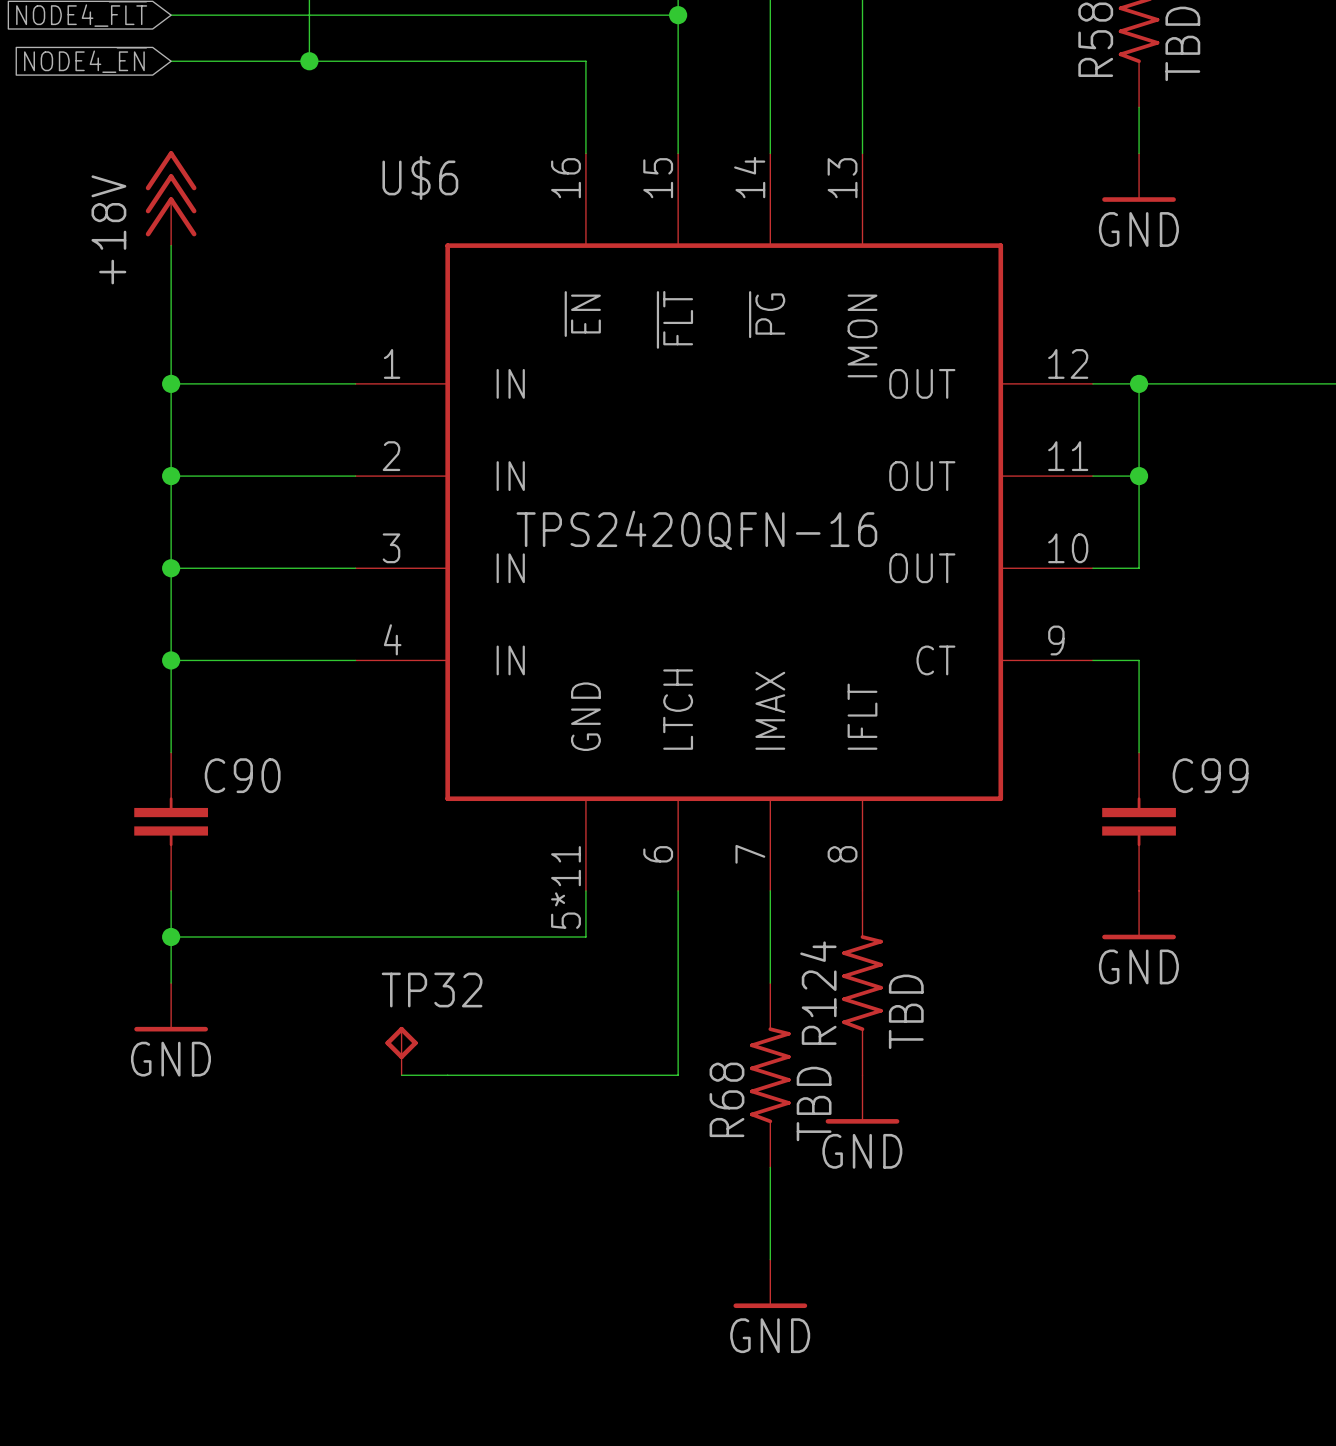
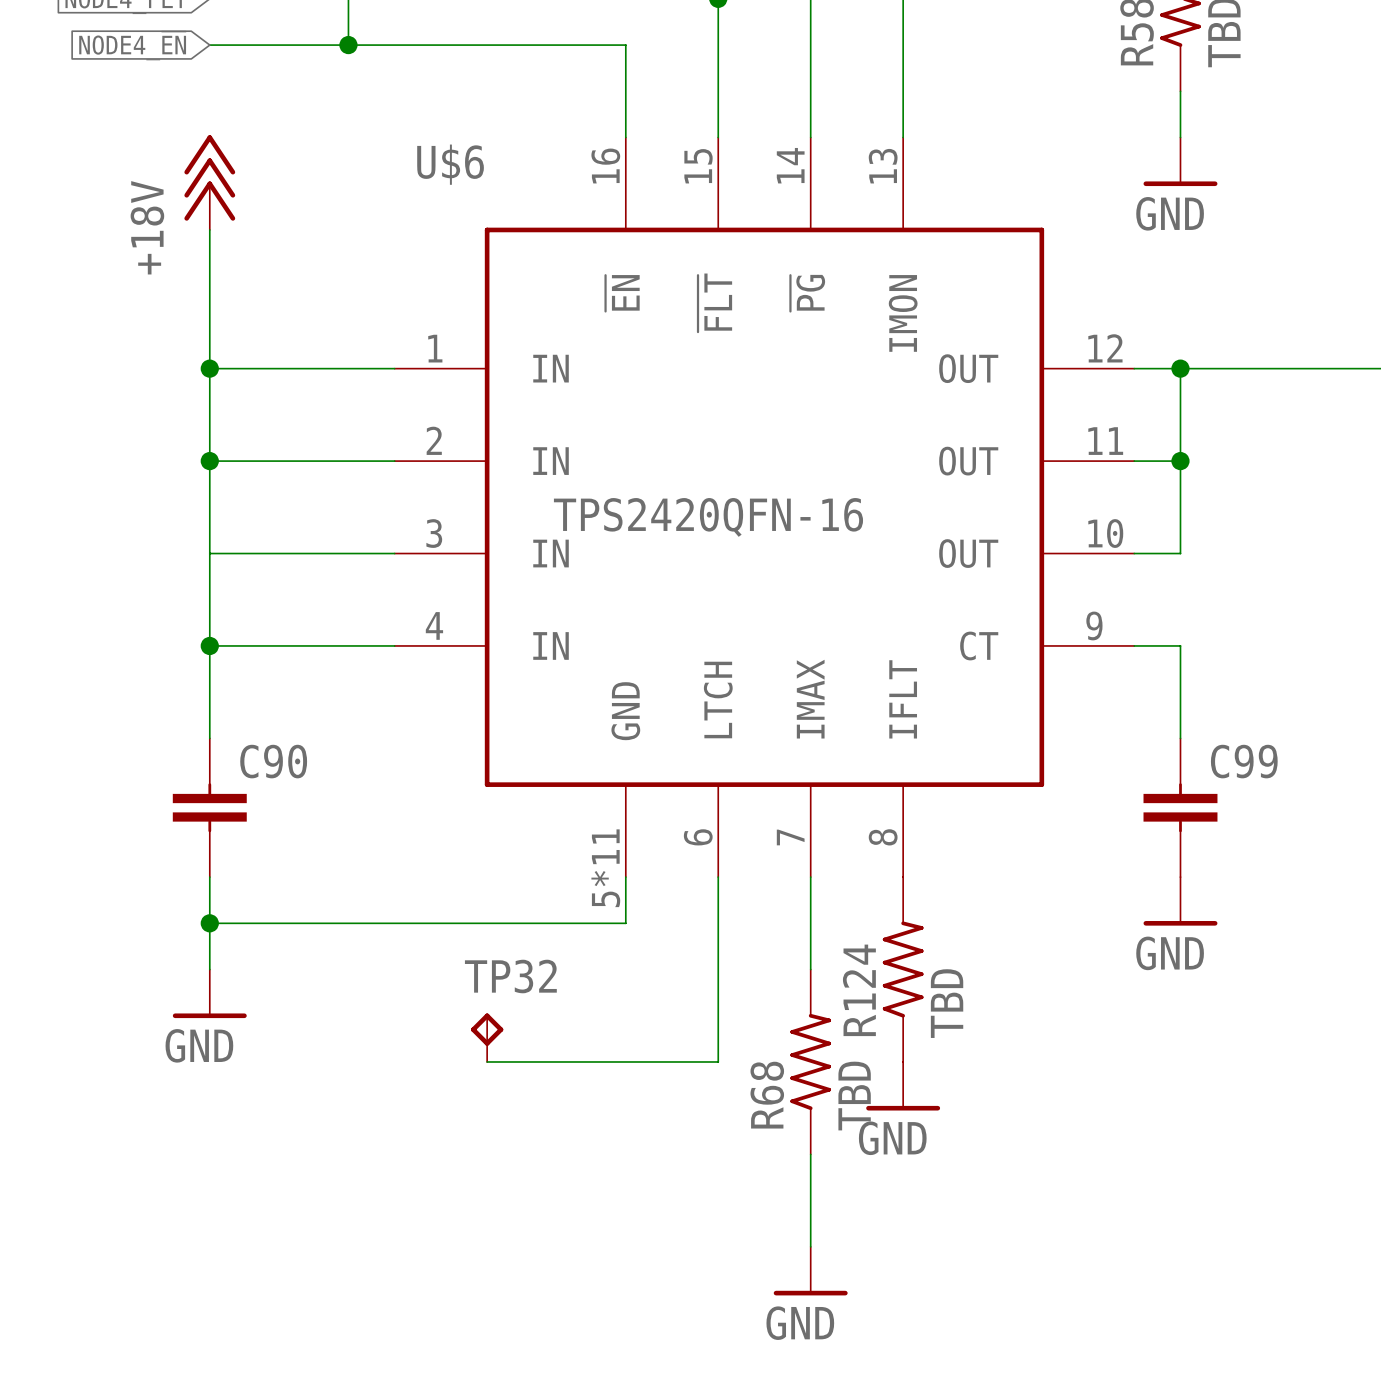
junction: (171, 568) -> none
TP32 position: (401, 1051) -> (487, 1037)
wire: (401, 1075) (447, 1075) -> none

